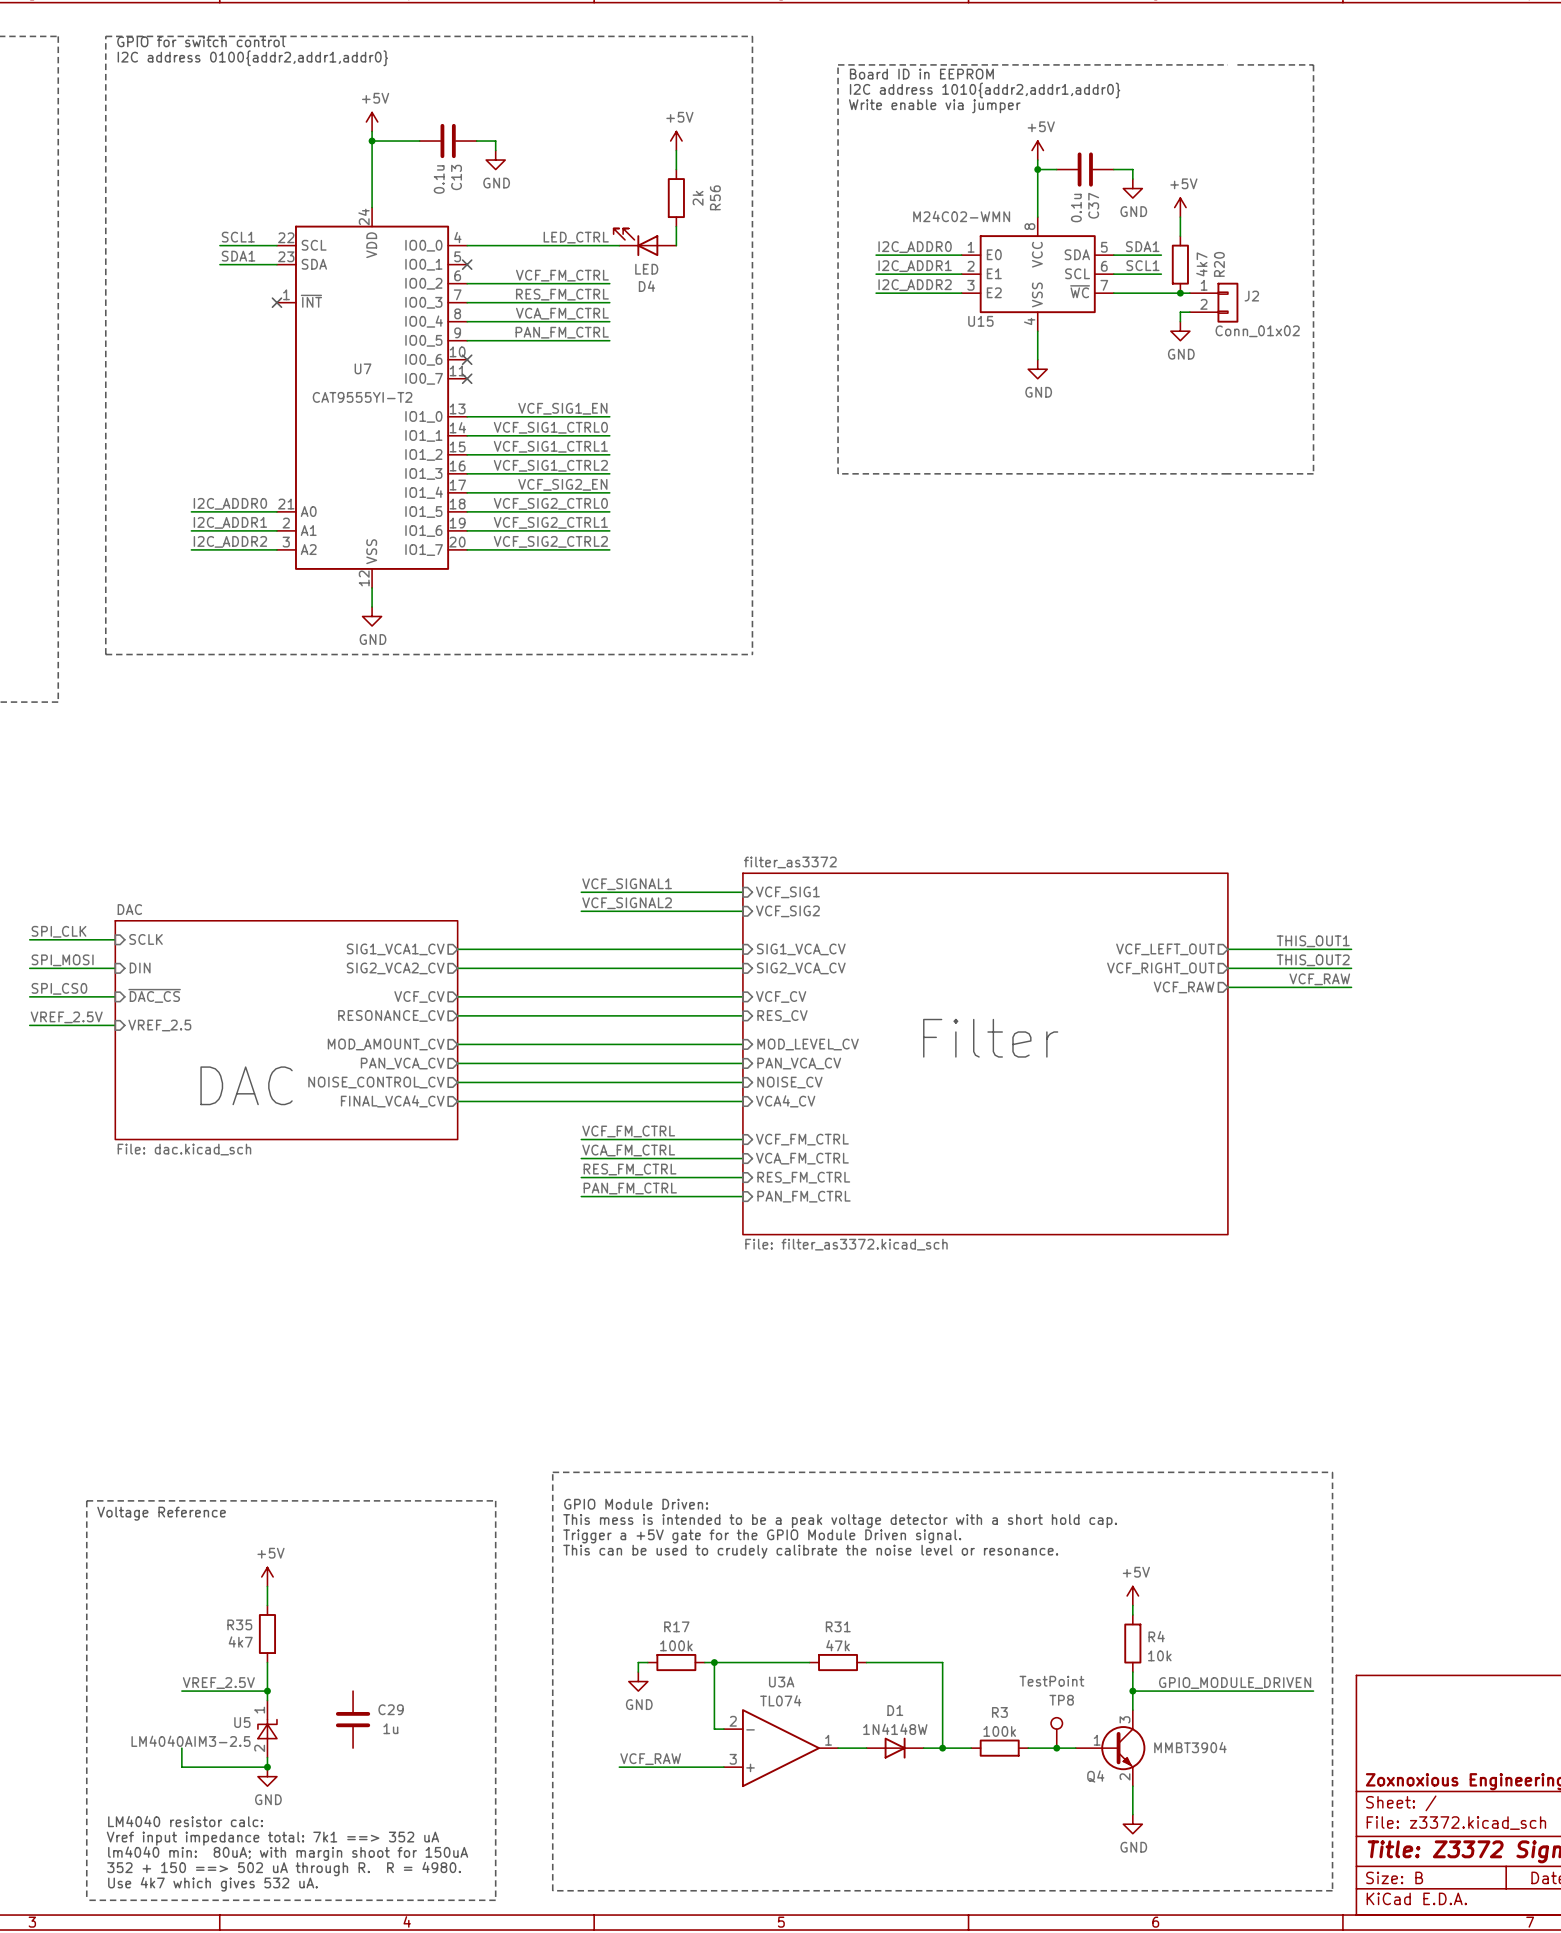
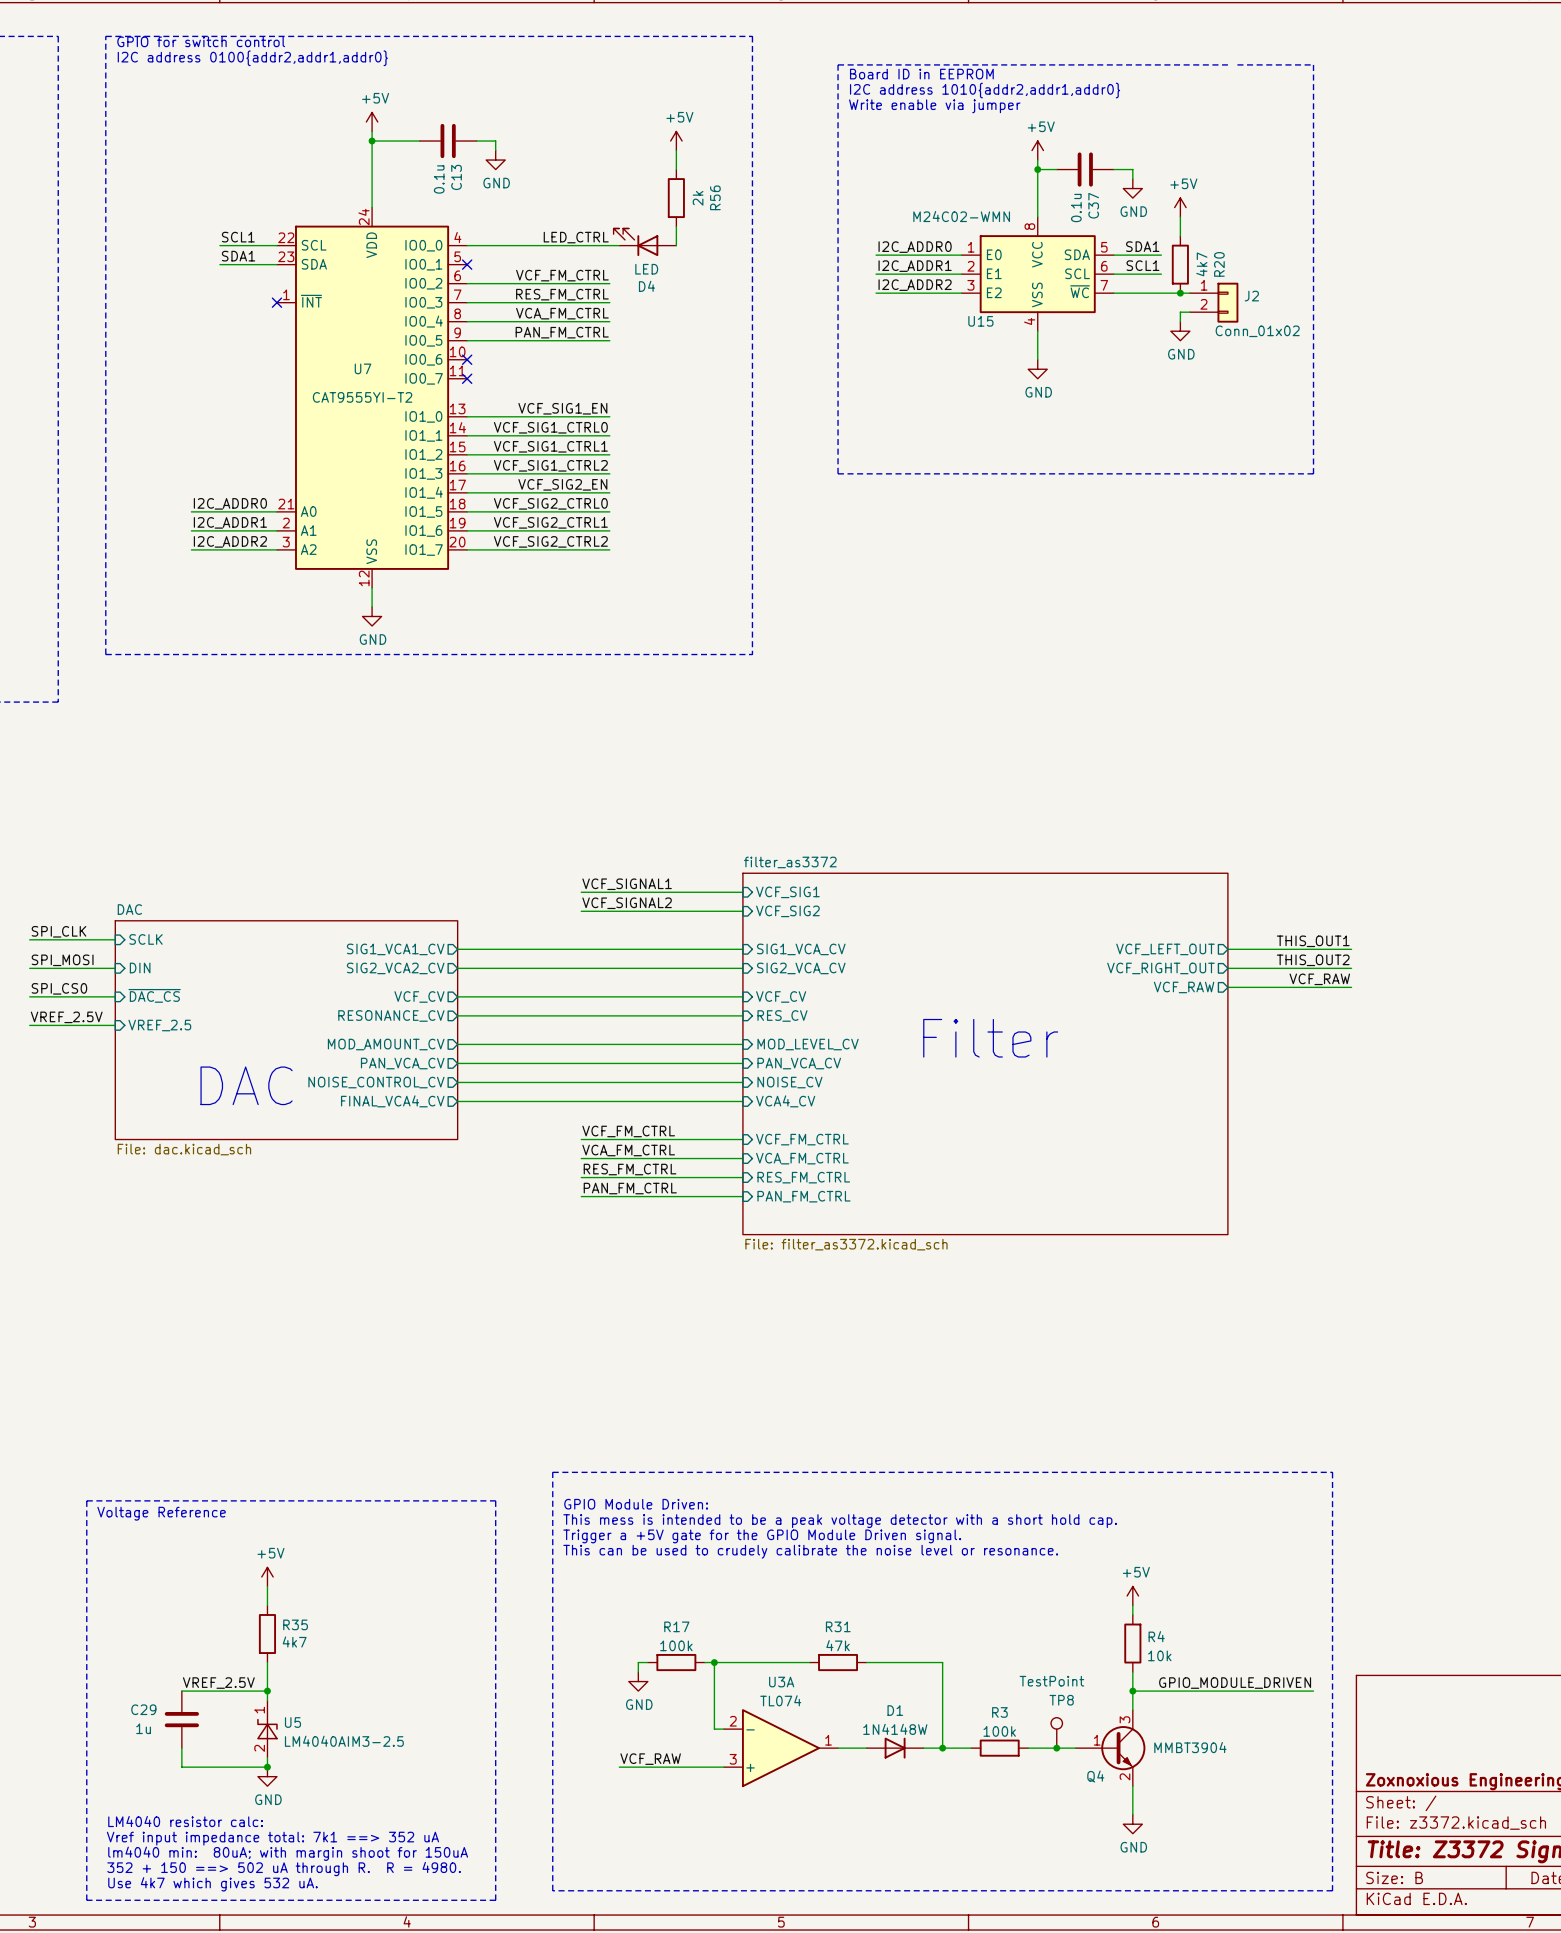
R35 name position: R35 (239, 1624) -> R35 (295, 1624)
R35 value position: 4k7 (240, 1641) -> 4k7 (294, 1641)
C29 name position: C29 (391, 1709) -> C29 (143, 1709)
C29 position: (353, 1719) -> (181, 1719)
C29 value position: 1u (390, 1728) -> 1u (143, 1728)
U5 flip: as is (267, 1729) -> left-right (267, 1729)

